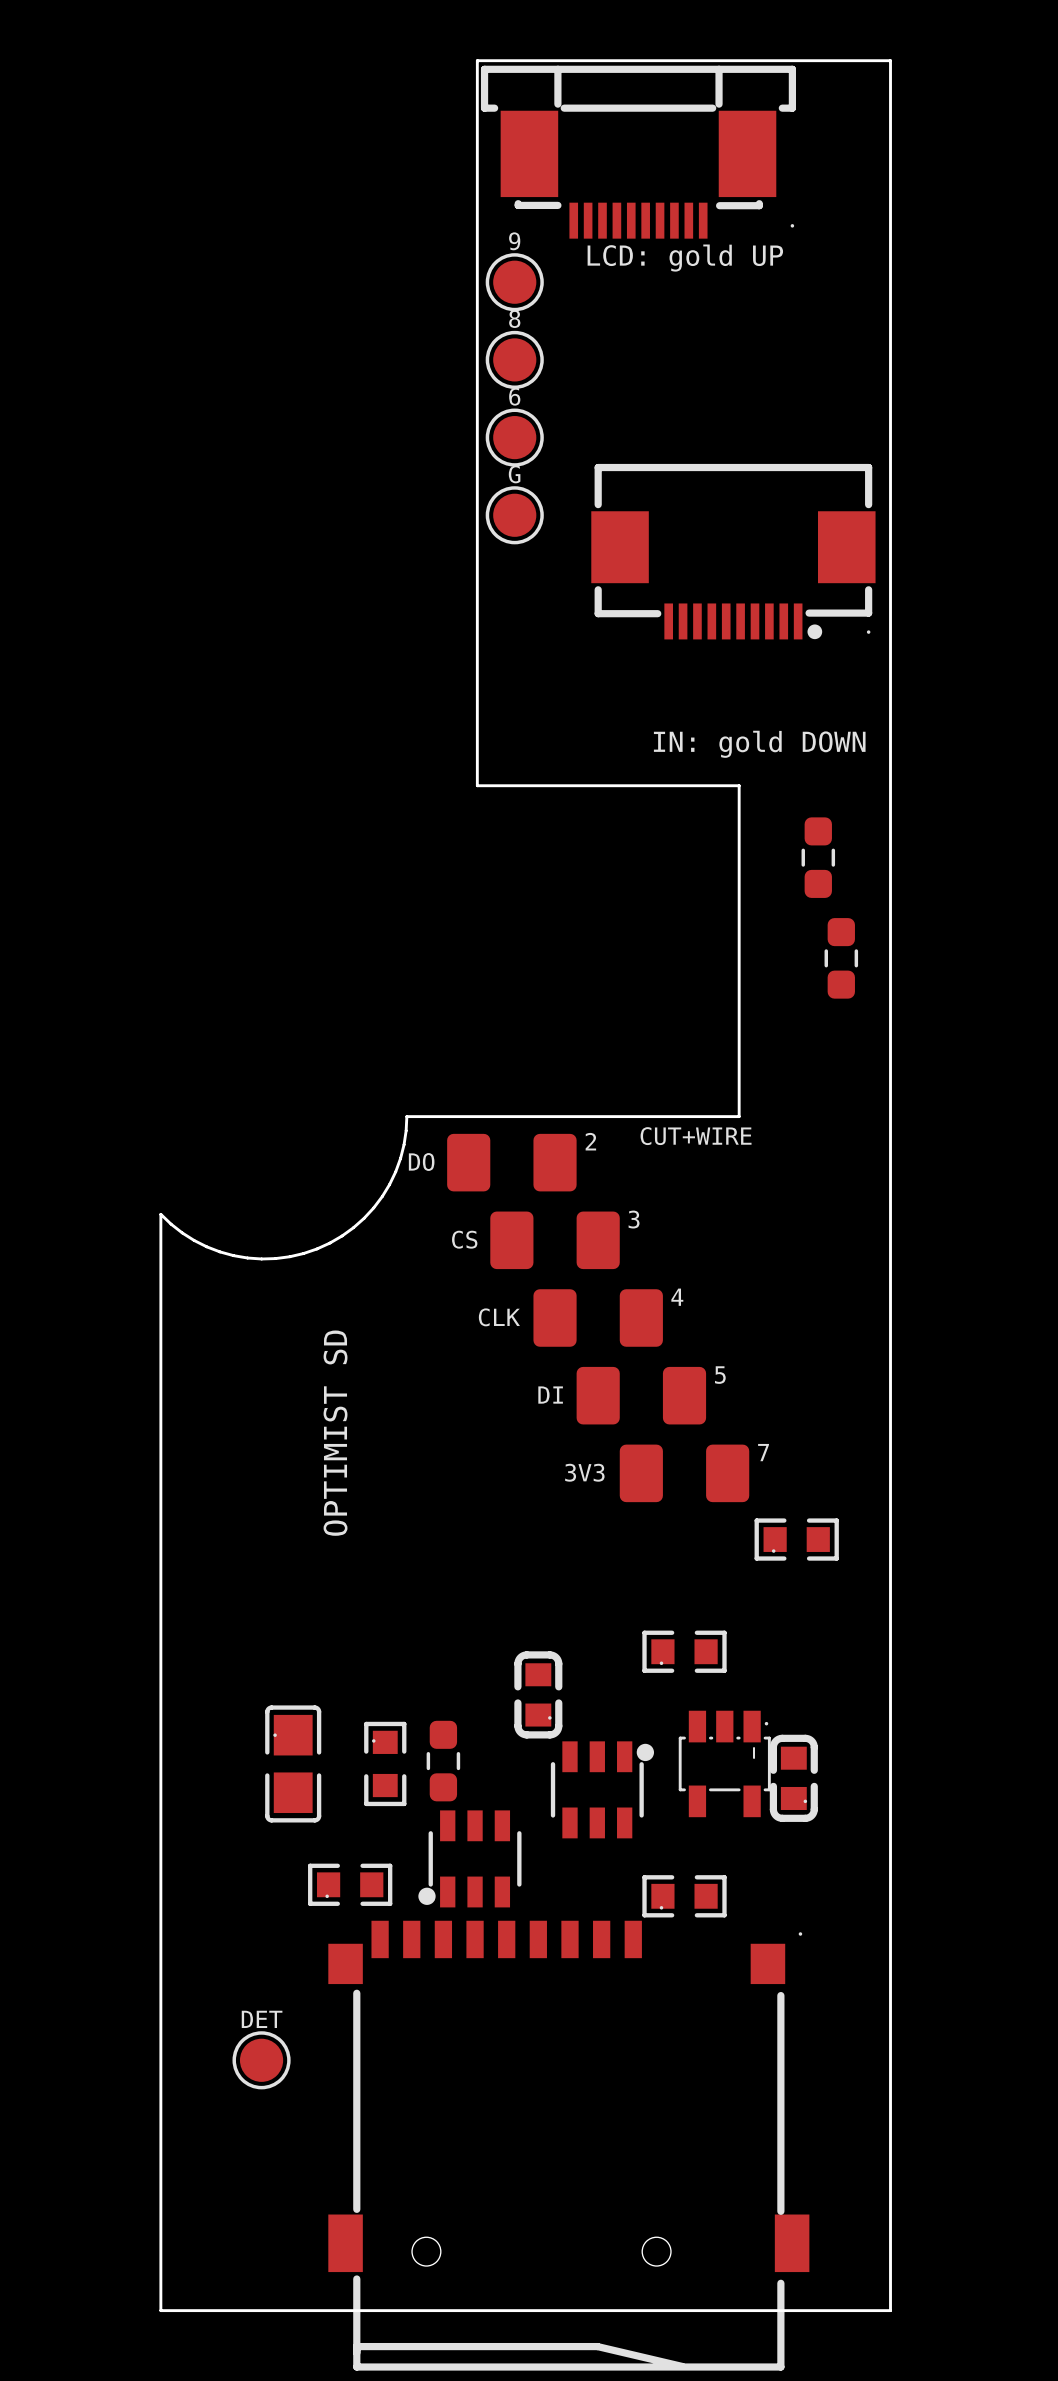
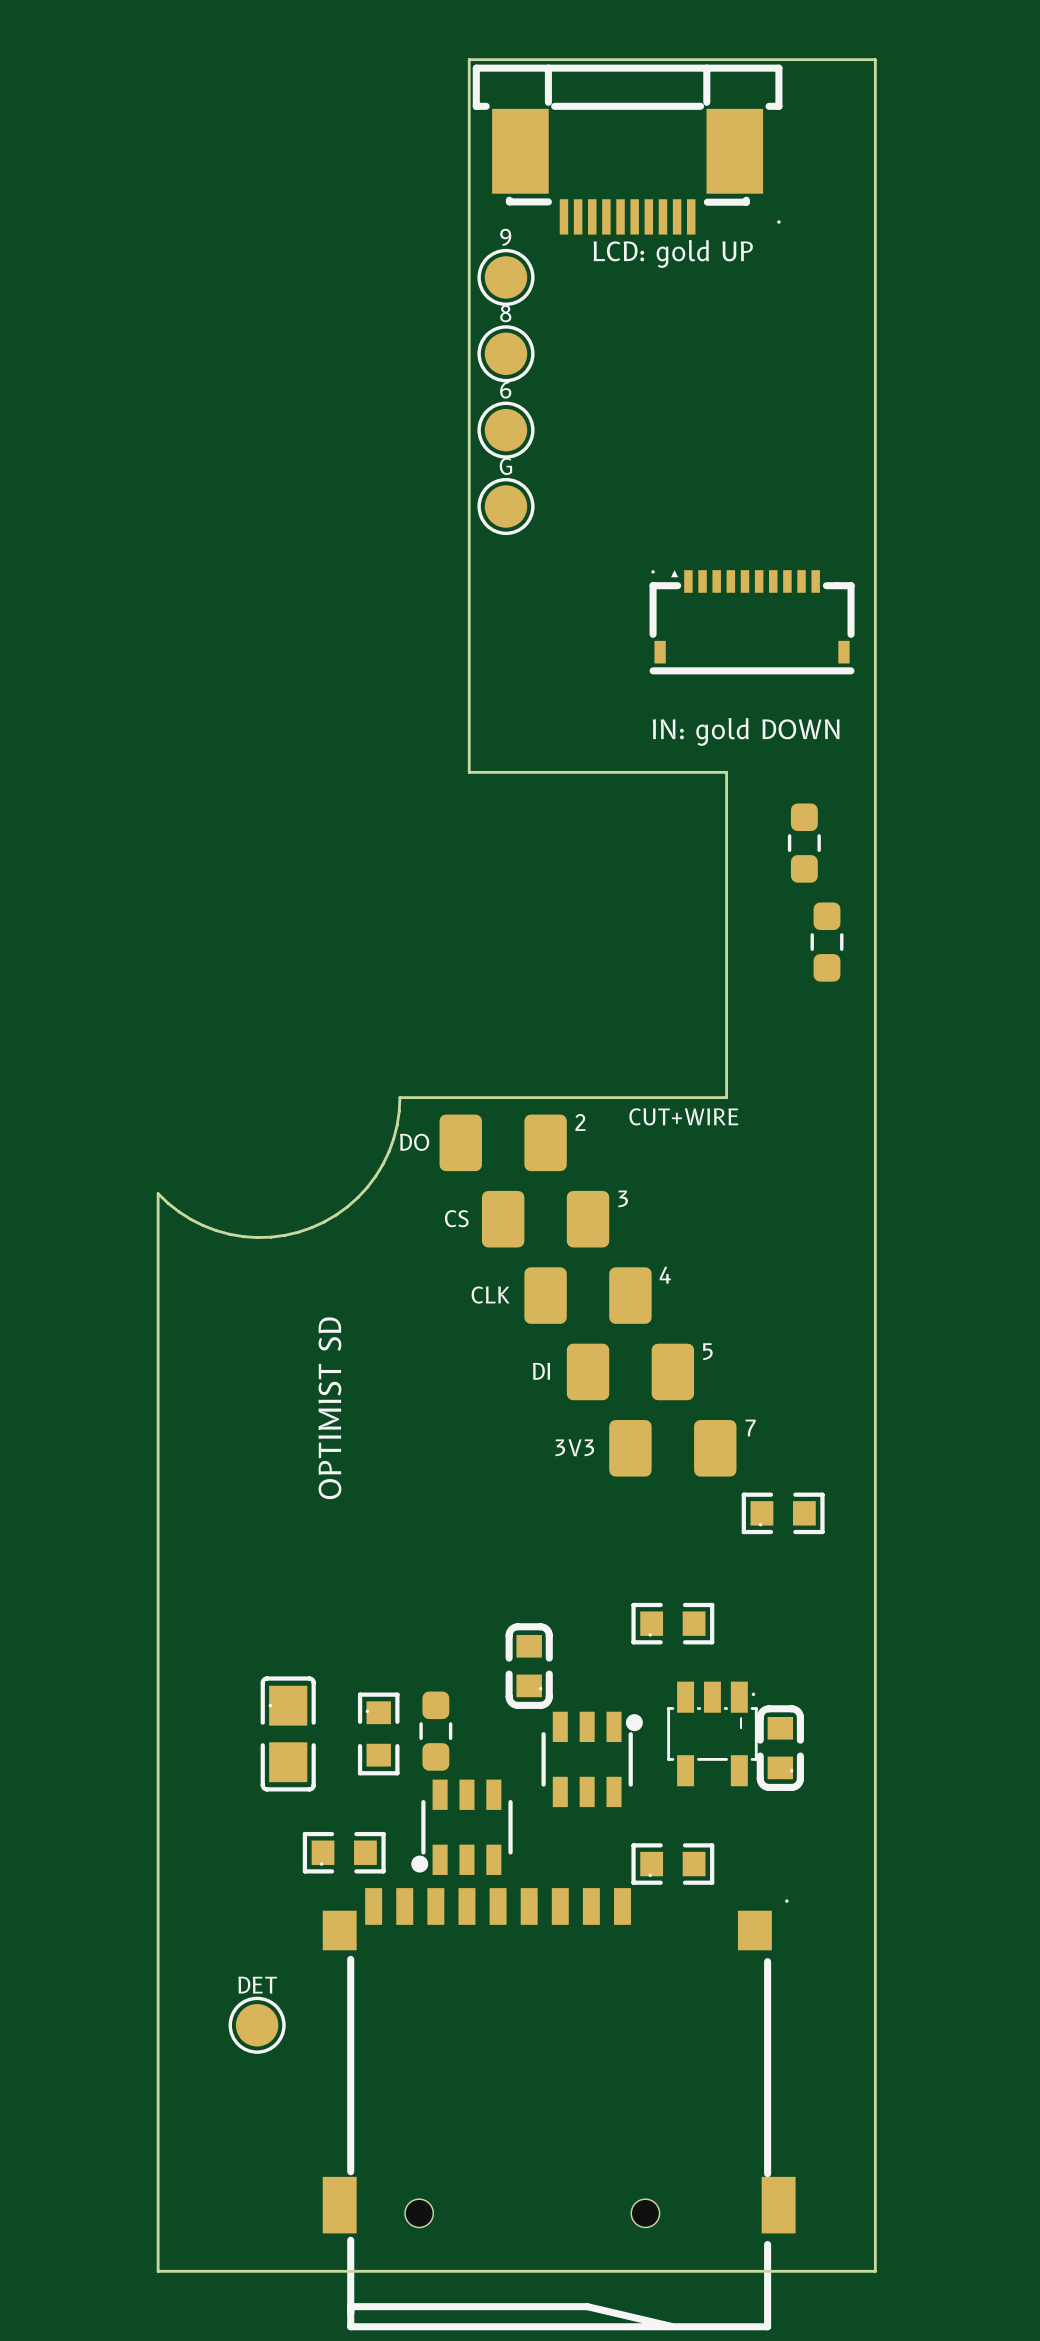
part: (733, 551) -> none
part: none -> (752, 622)

